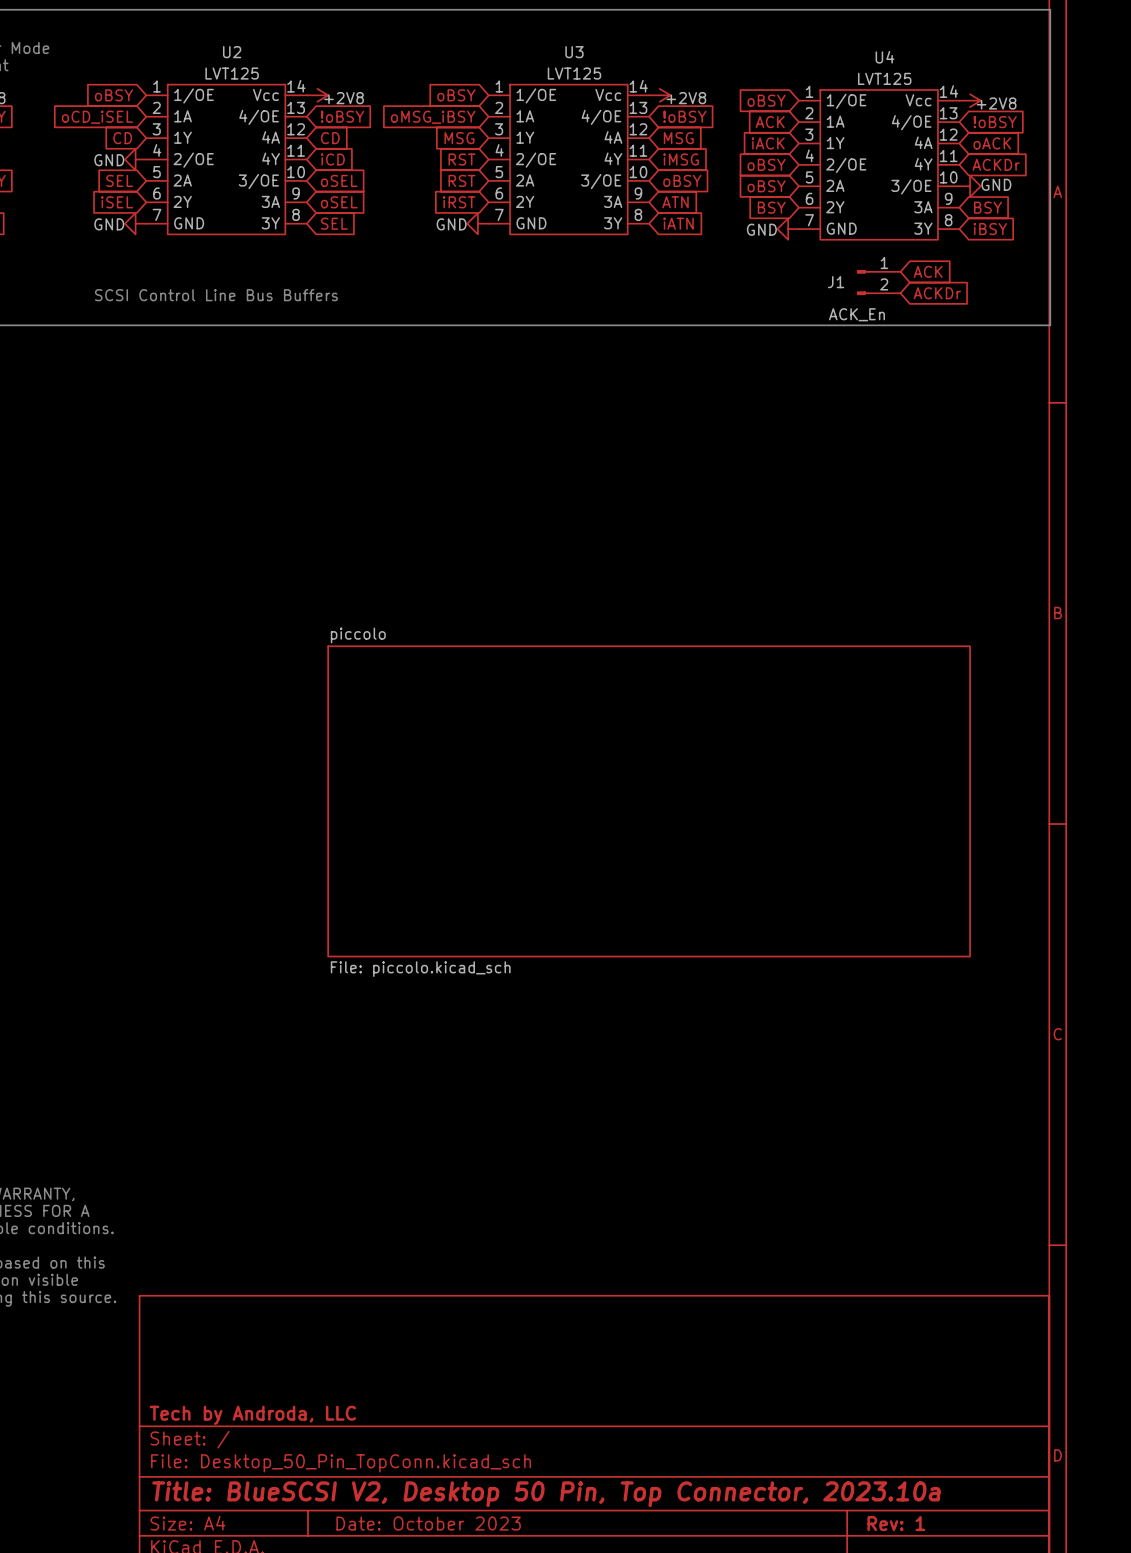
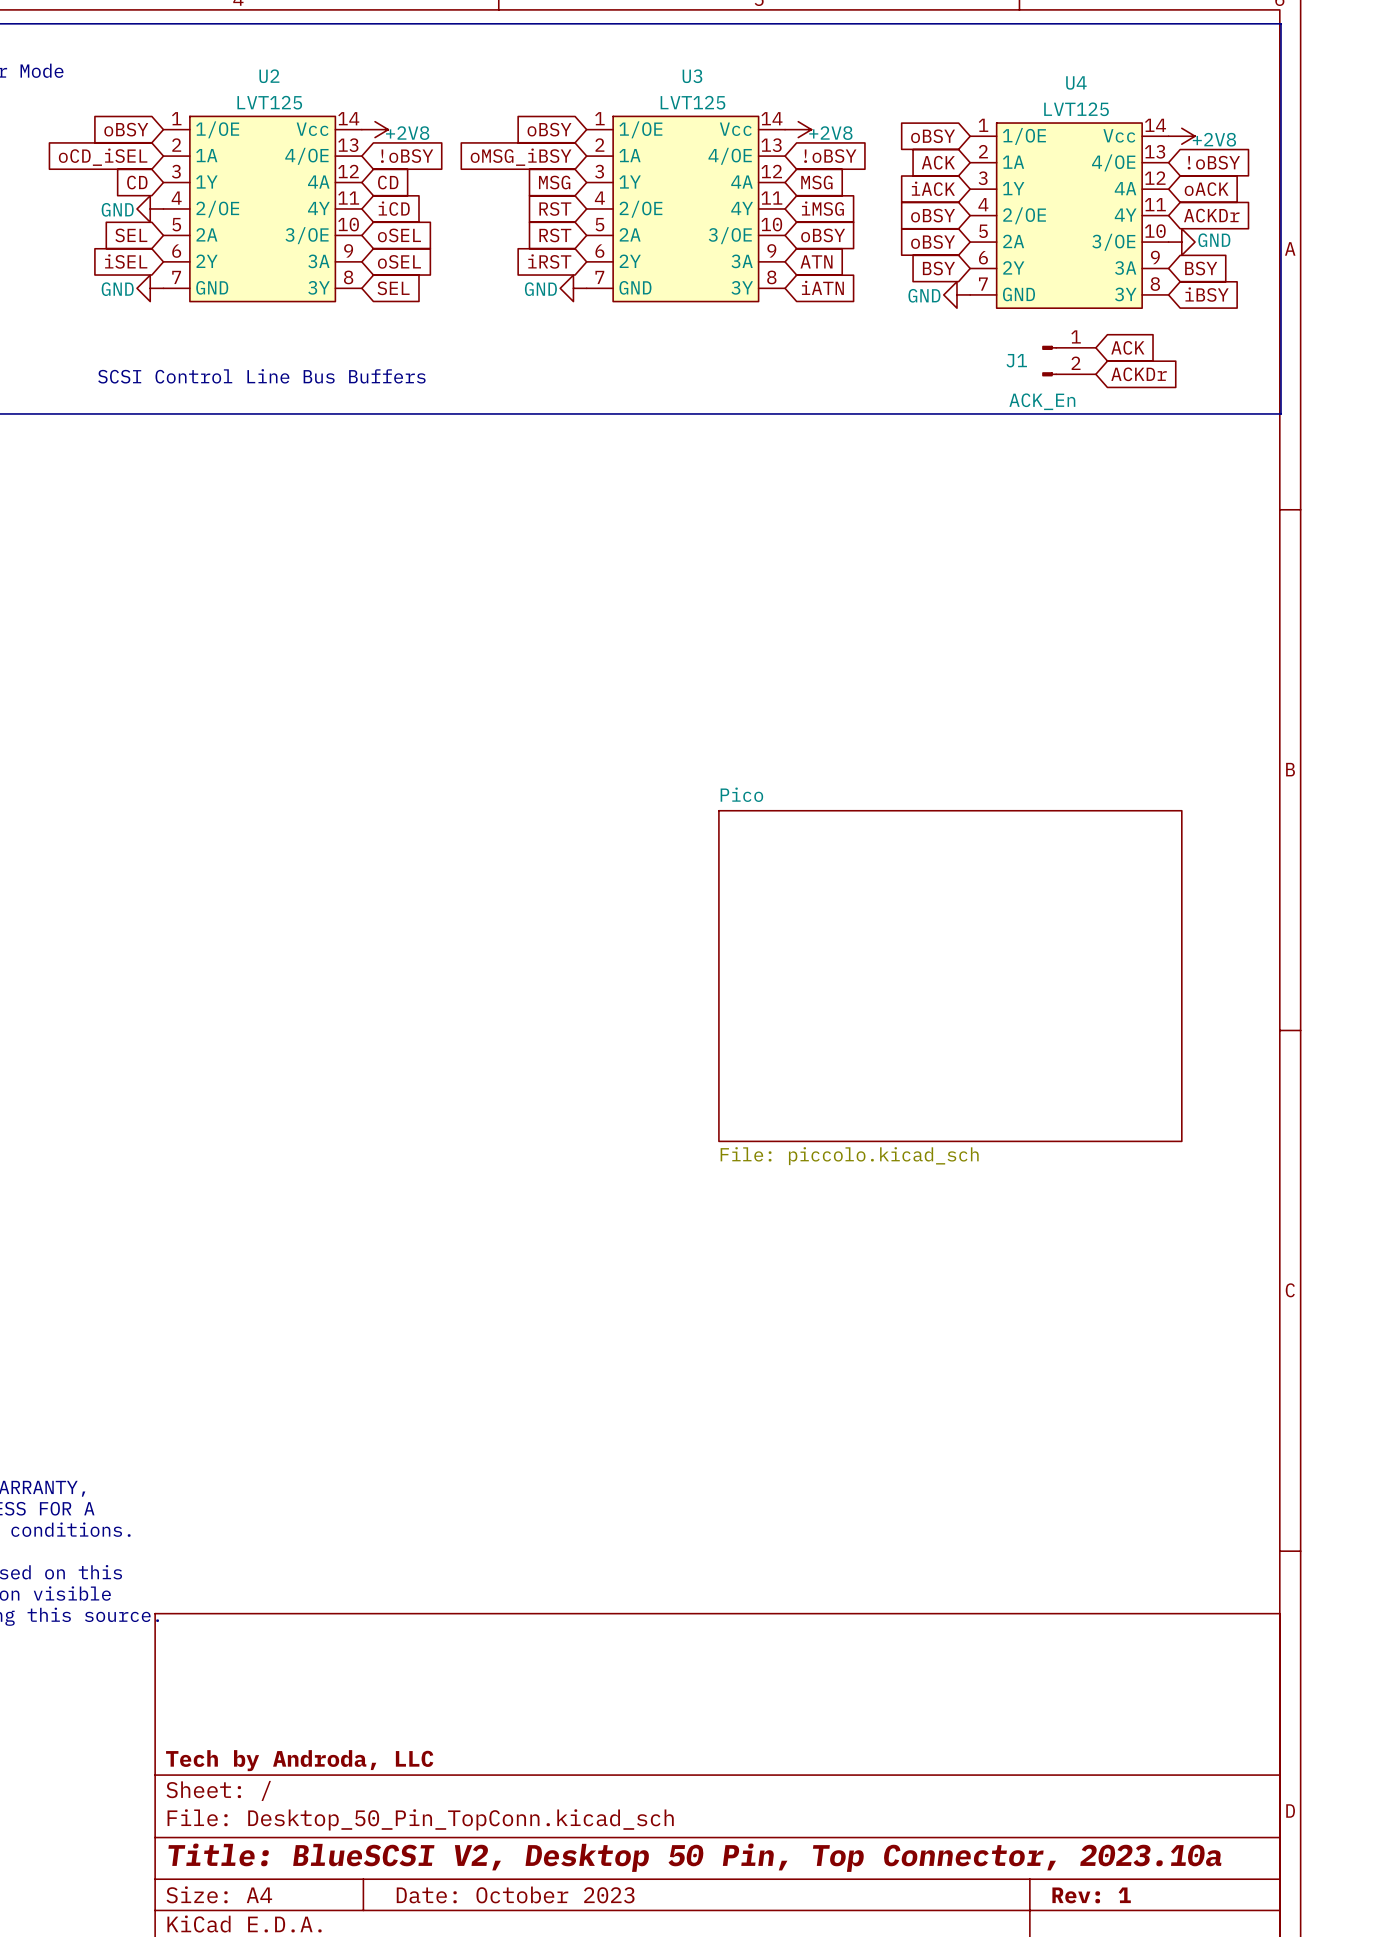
sheet Pico: none -> File: piccolo.kicad_sch (950, 976)
sheet piccolo: File: piccolo.kicad_sch (649, 801) -> none

